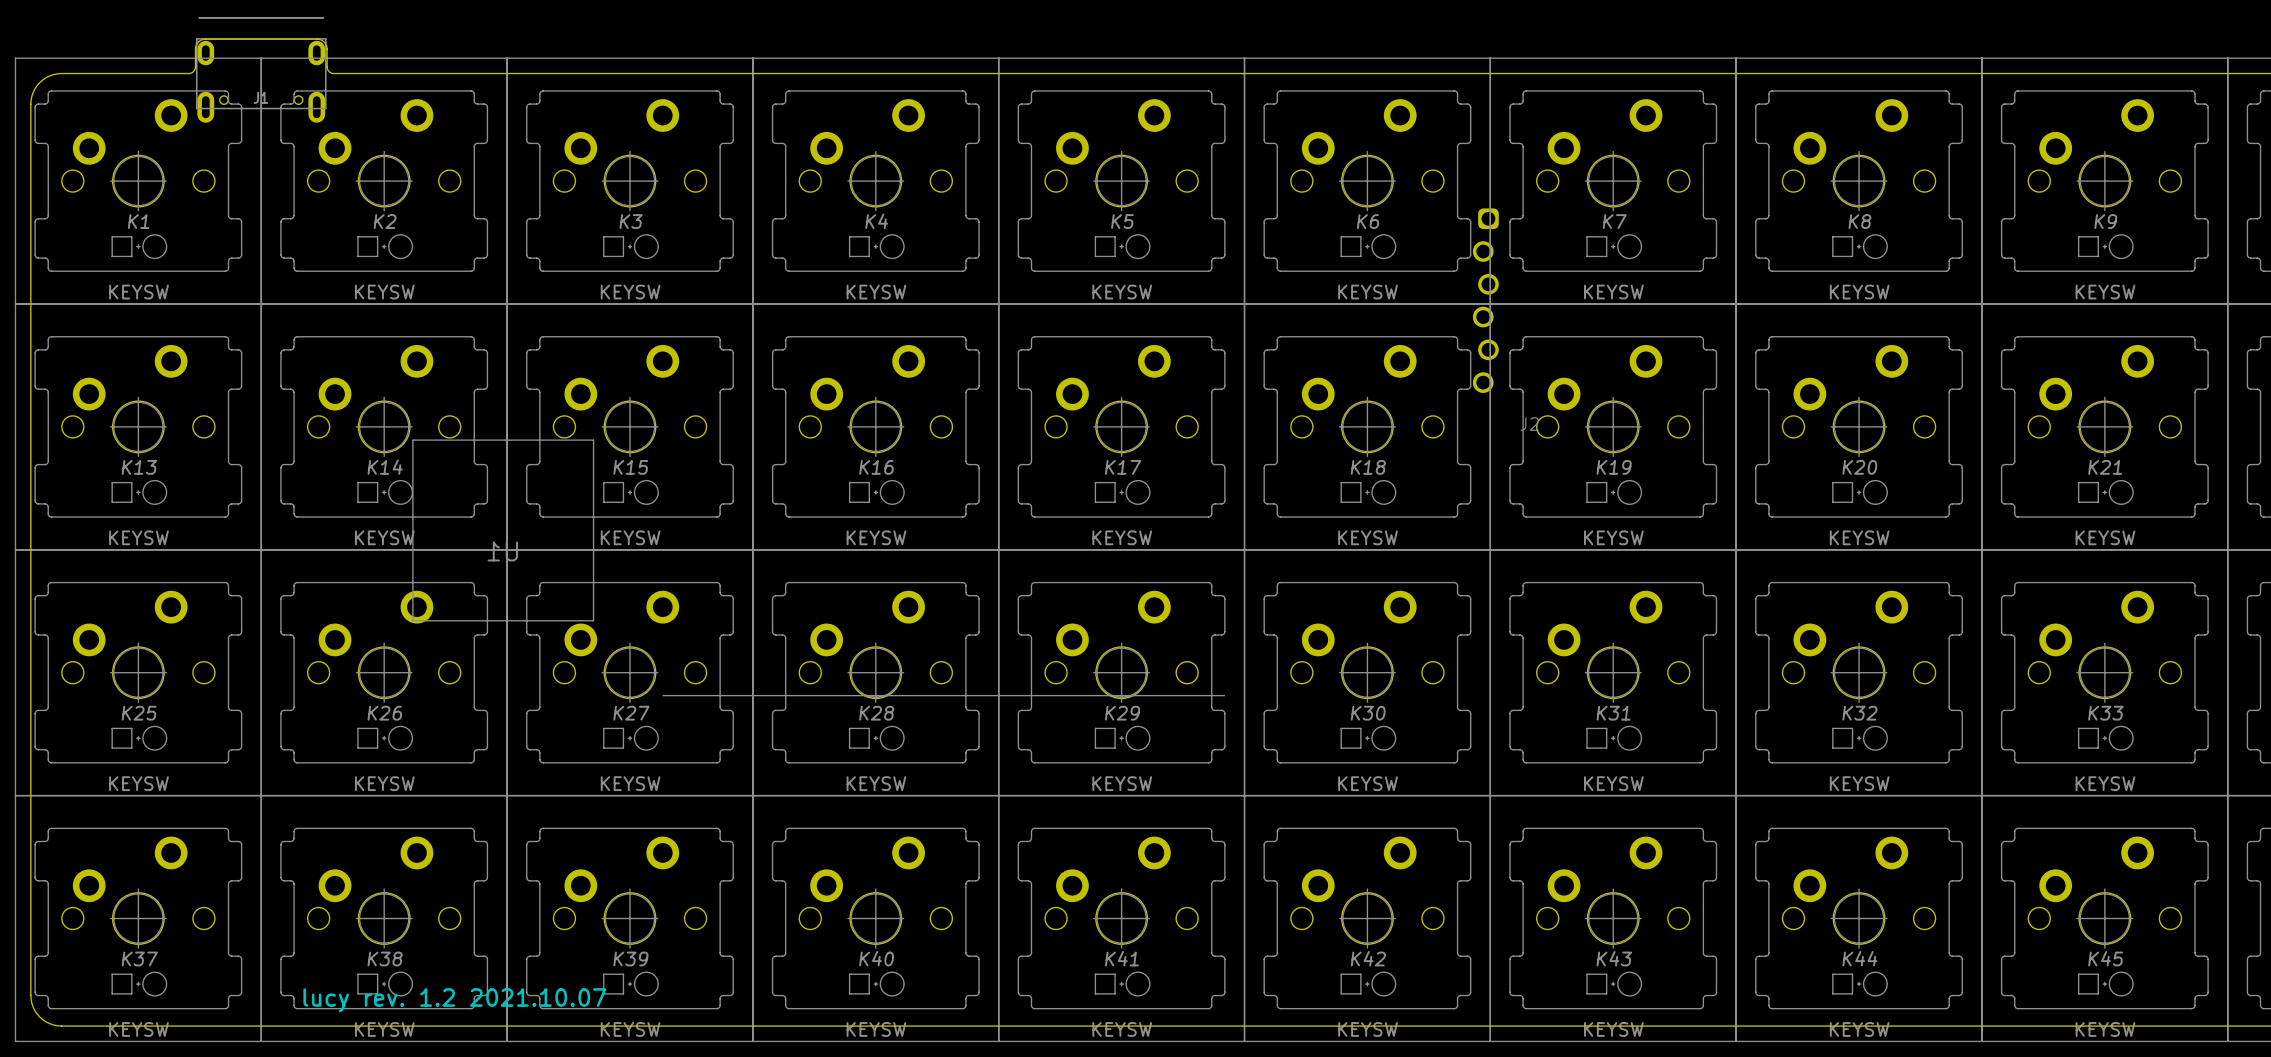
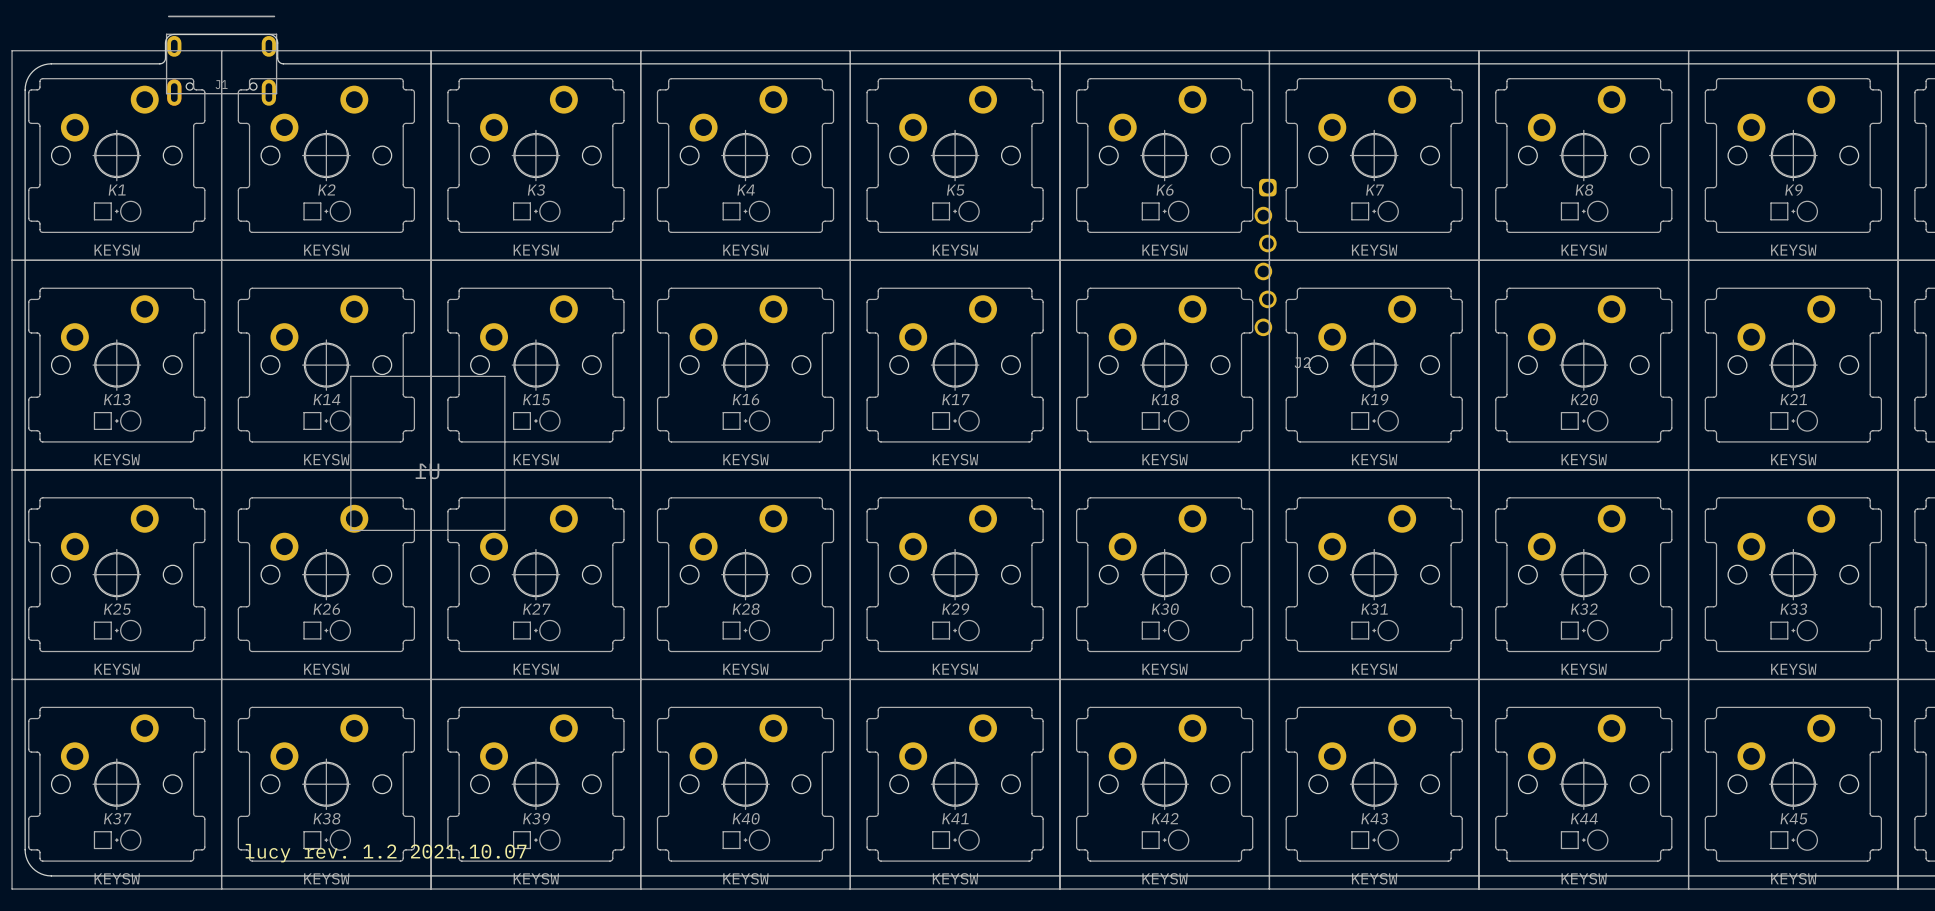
line: (663, 695) (1224, 695) -> none

